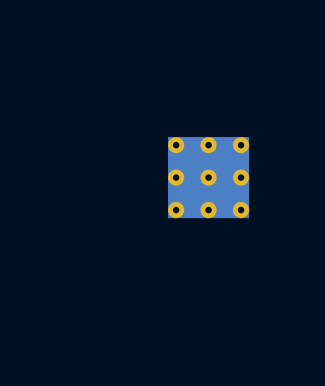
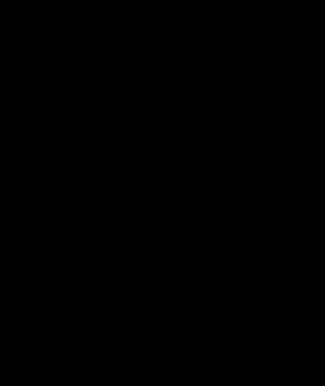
part: (208, 177) -> none

